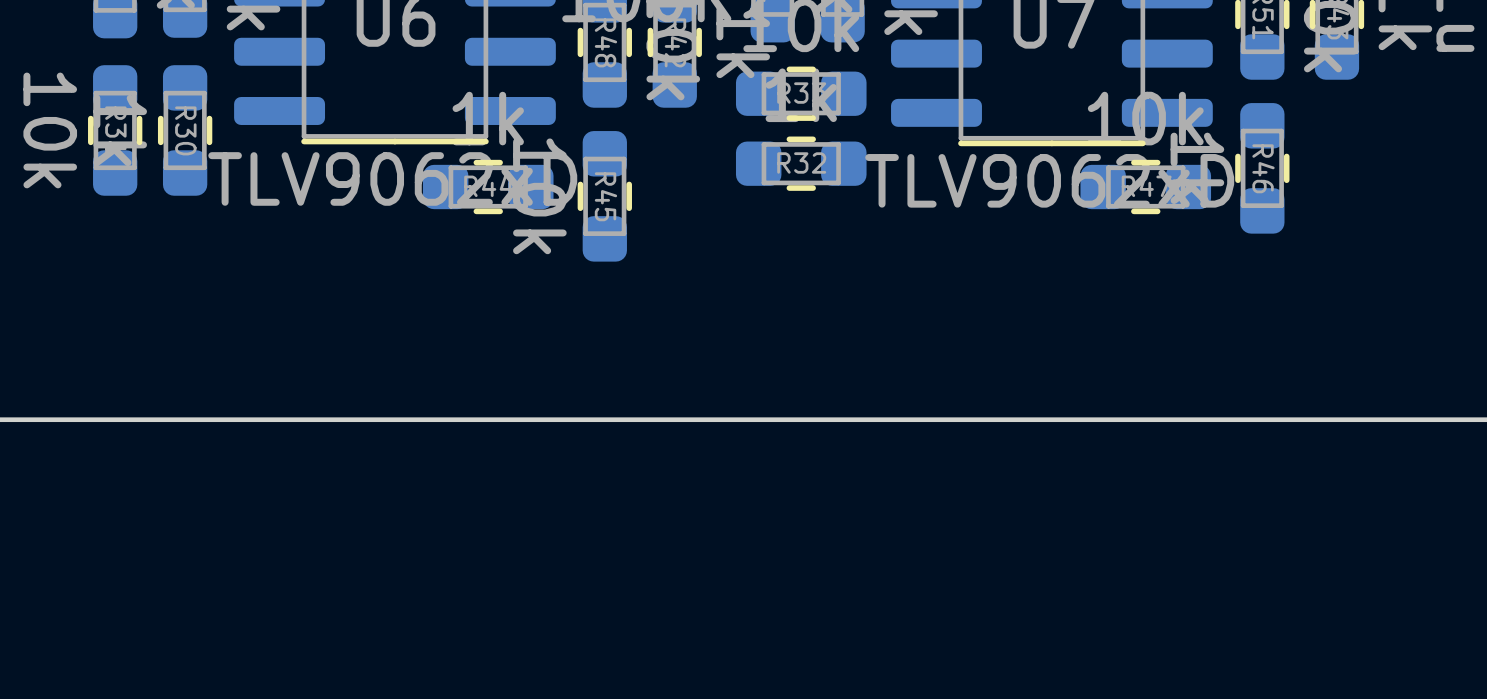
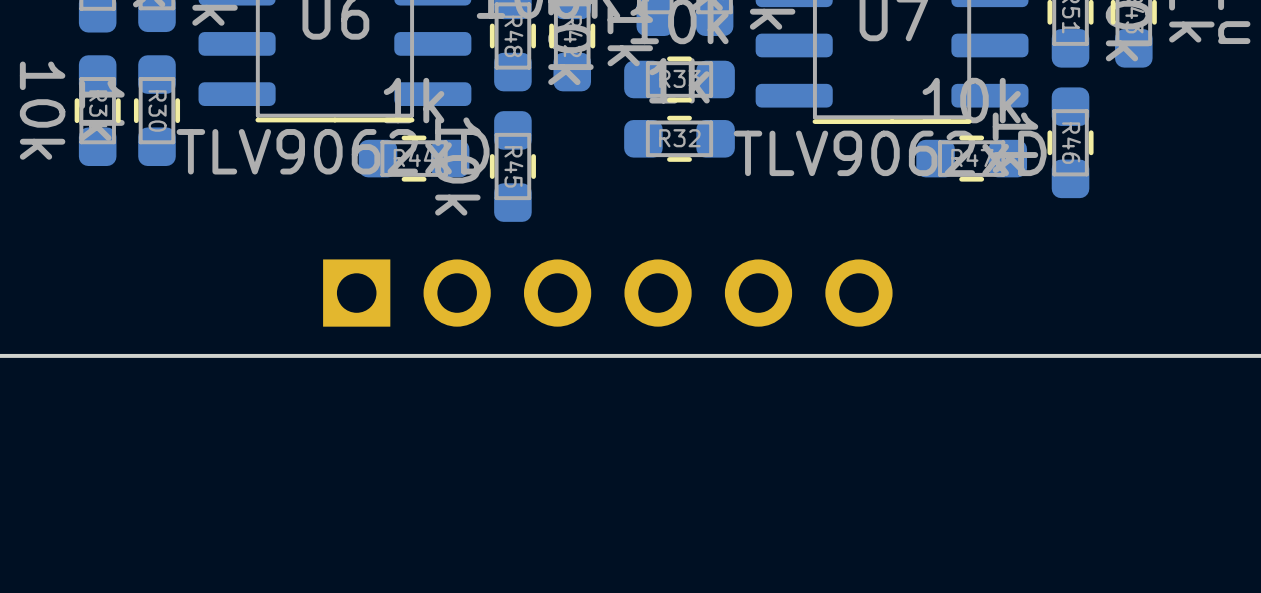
part: none -> (607, 293)

